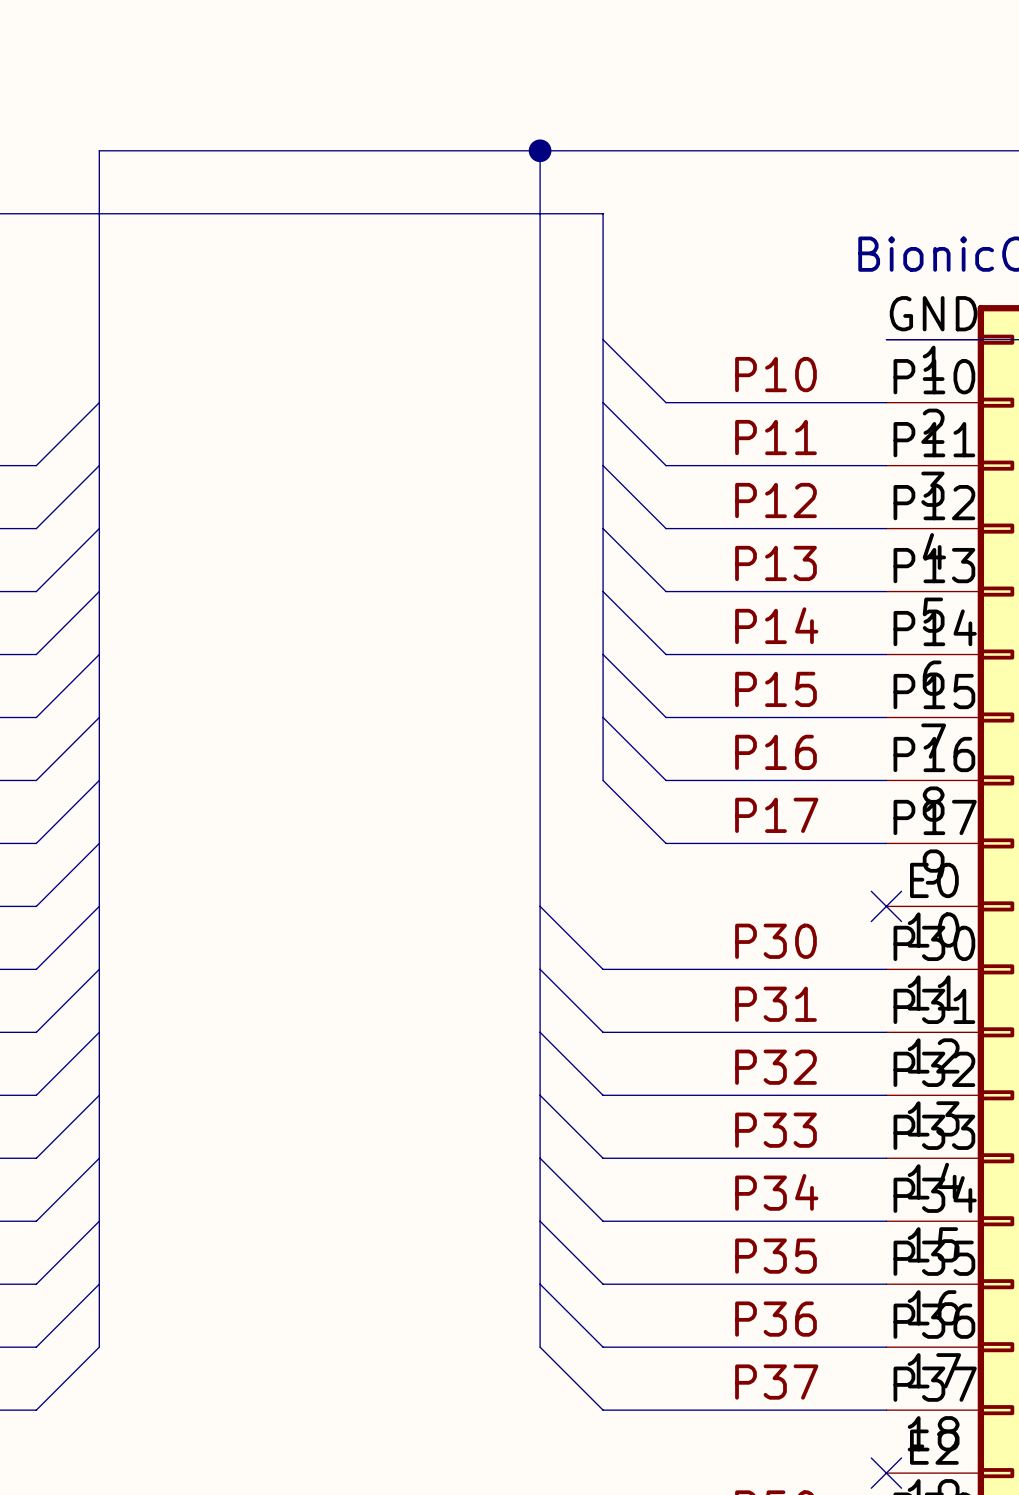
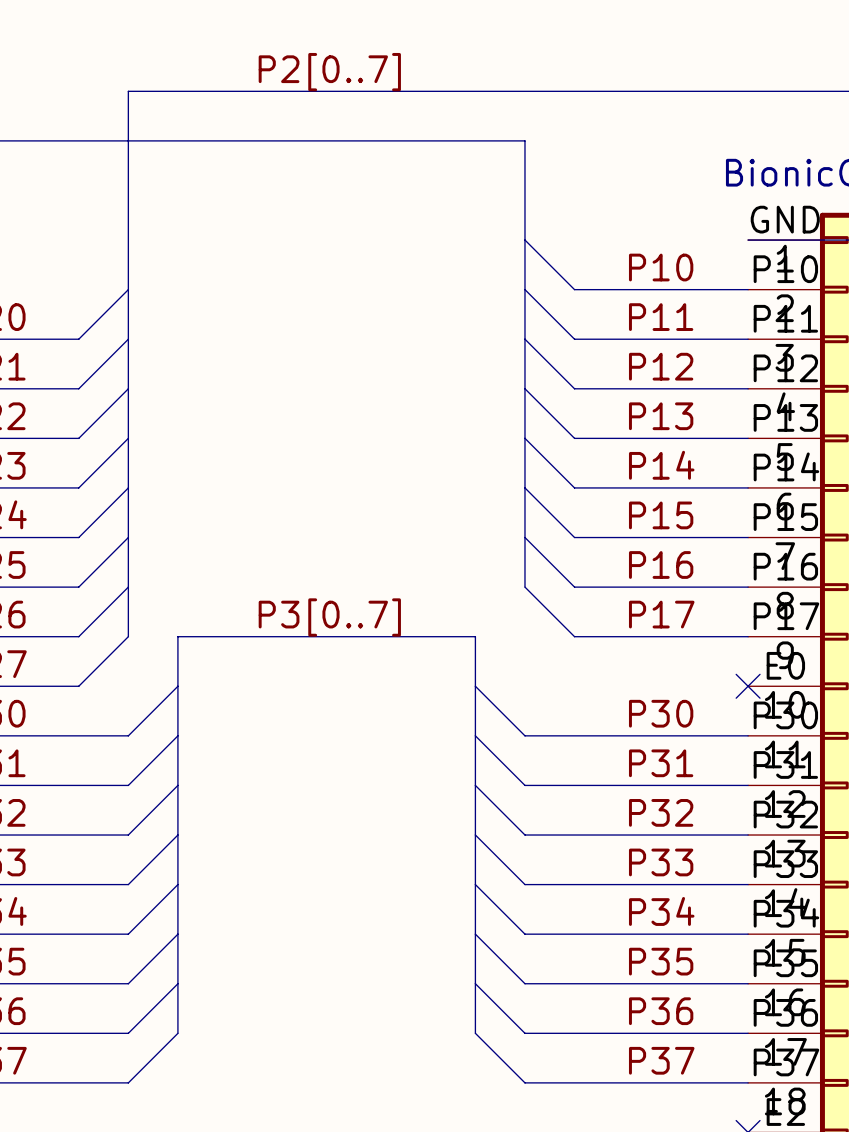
label: none -> P2[0..7] (329, 72)
bus: (540, 150) (540, 843) -> (177, 1033) (177, 636) (475, 636)
junction: (540, 150) -> none
label: none -> P3[0..7] (329, 617)
bus: (99, 843) (99, 1347) -> none
wire: (99, 906) (36, 969) -> (177, 686) (128, 735) (78, 735)
wire: (99, 969) (36, 1032) -> (177, 735) (128, 785) (78, 785)
wire: (99, 1032) (36, 1095) -> (177, 785) (128, 835) (78, 835)
wire: (99, 1095) (36, 1158) -> (177, 835) (128, 884) (78, 884)
wire: (99, 1158) (36, 1221) -> (177, 884) (128, 934) (78, 934)
wire: (99, 1221) (36, 1284) -> (177, 934) (128, 983) (78, 983)
wire: (99, 1284) (36, 1347) -> (177, 983) (128, 1033) (78, 1033)
wire: (99, 1347) (36, 1410) -> (177, 1033) (128, 1082) (78, 1082)

